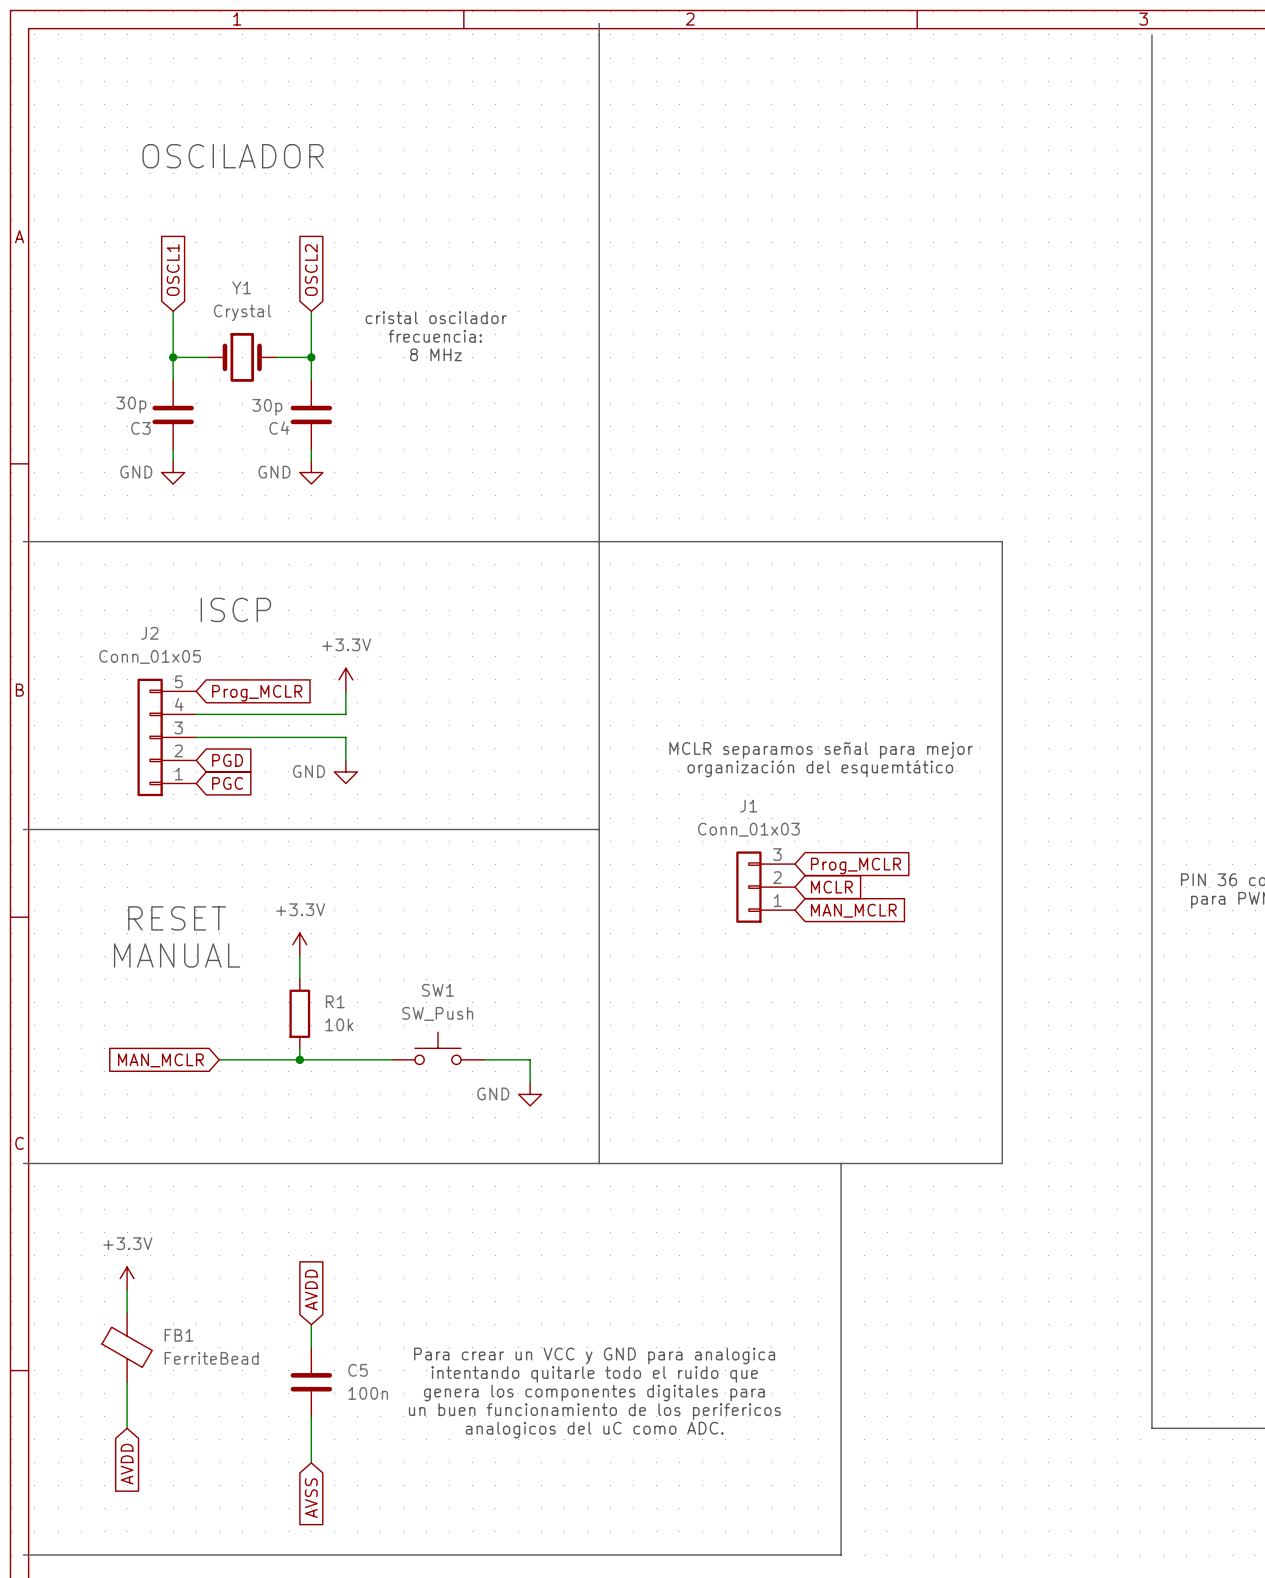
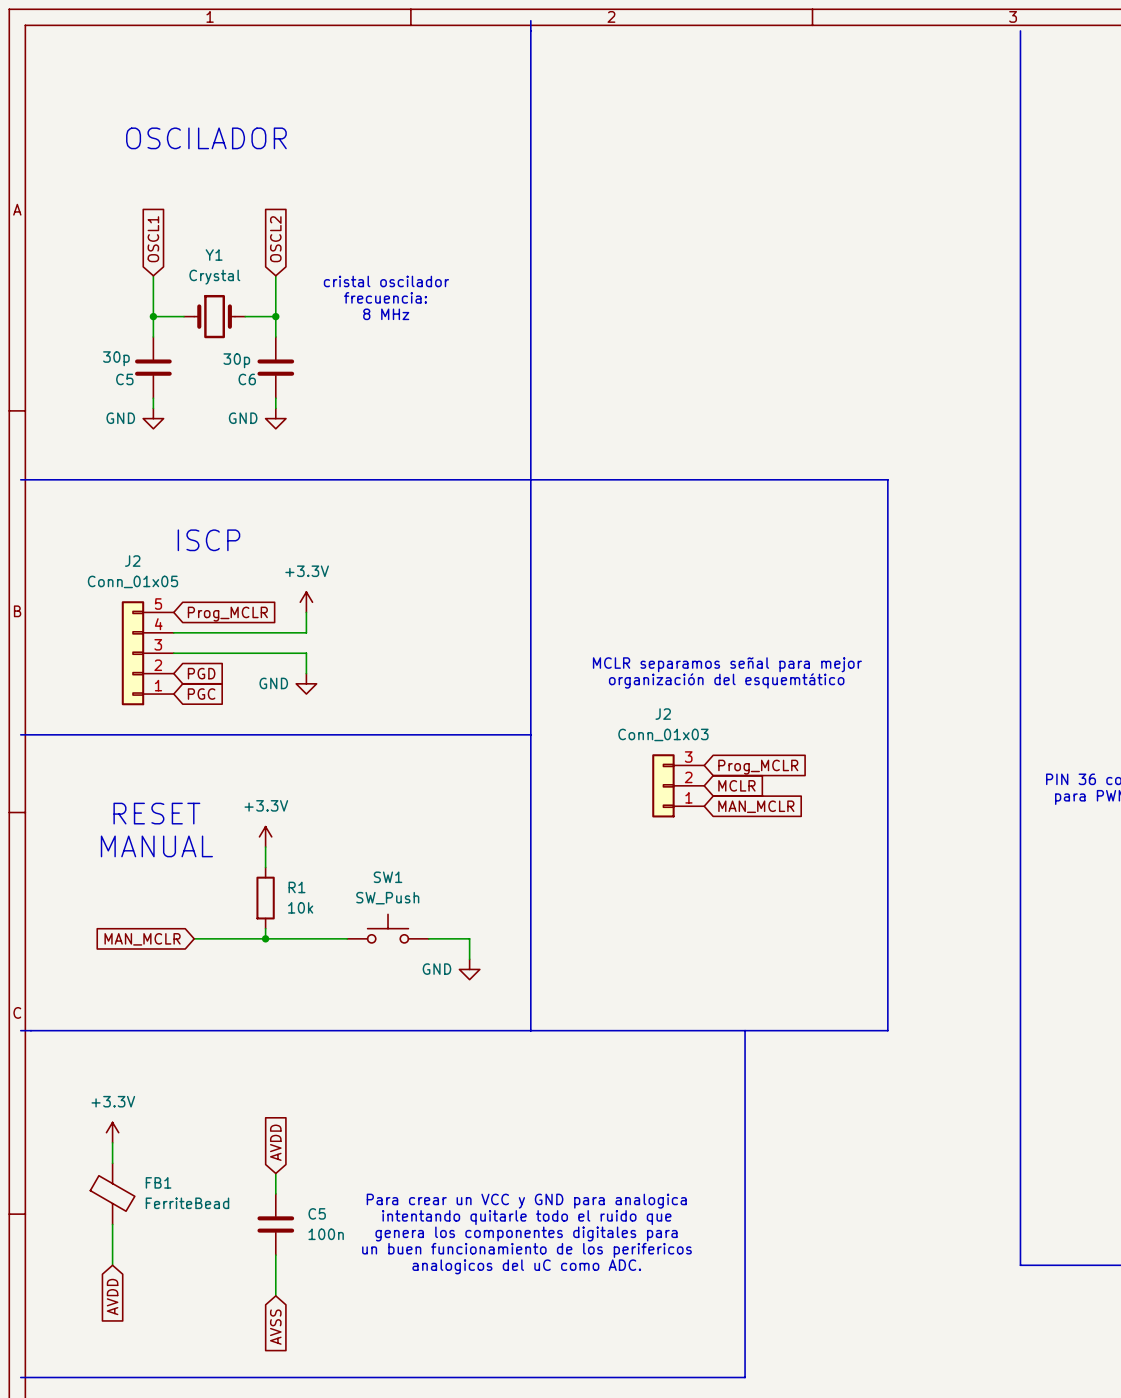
C3 name: C3 (140, 428) -> C5 (124, 379)
C4 name: C4 (279, 428) -> C6 (247, 379)
J1 name: J1 (748, 806) -> J2 (663, 714)

